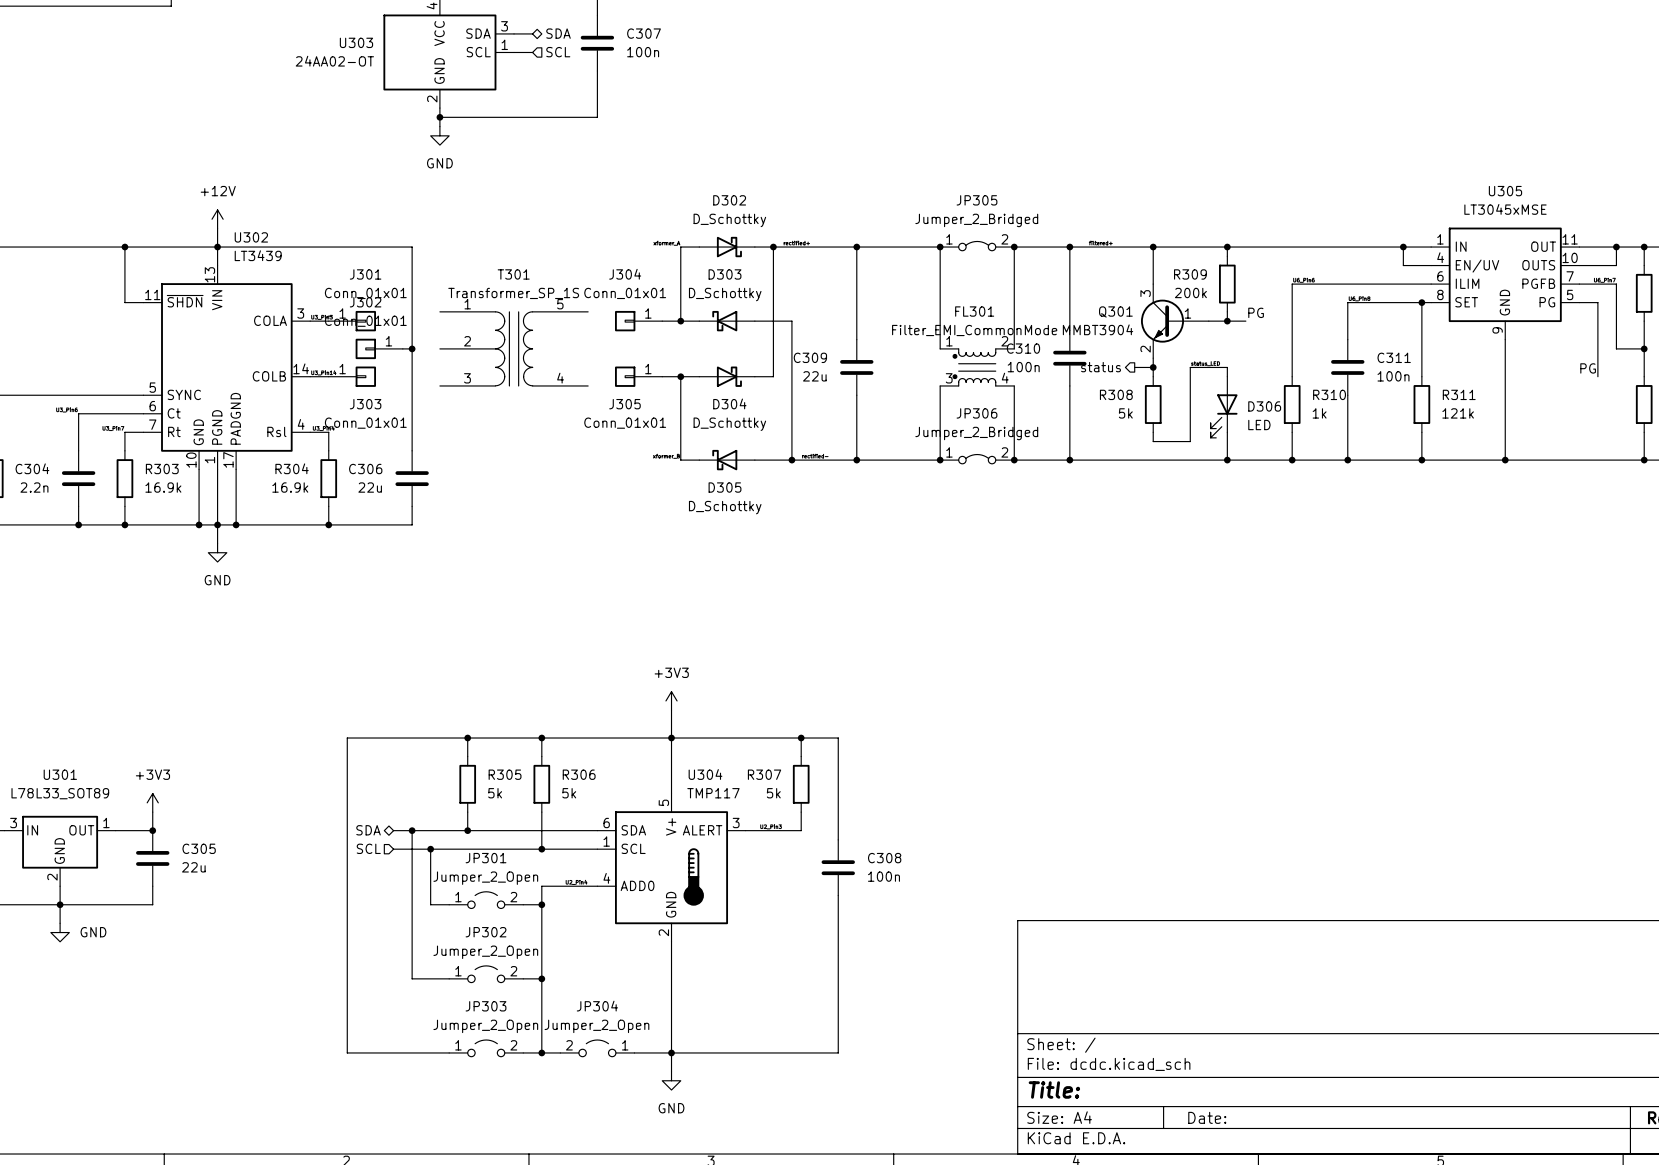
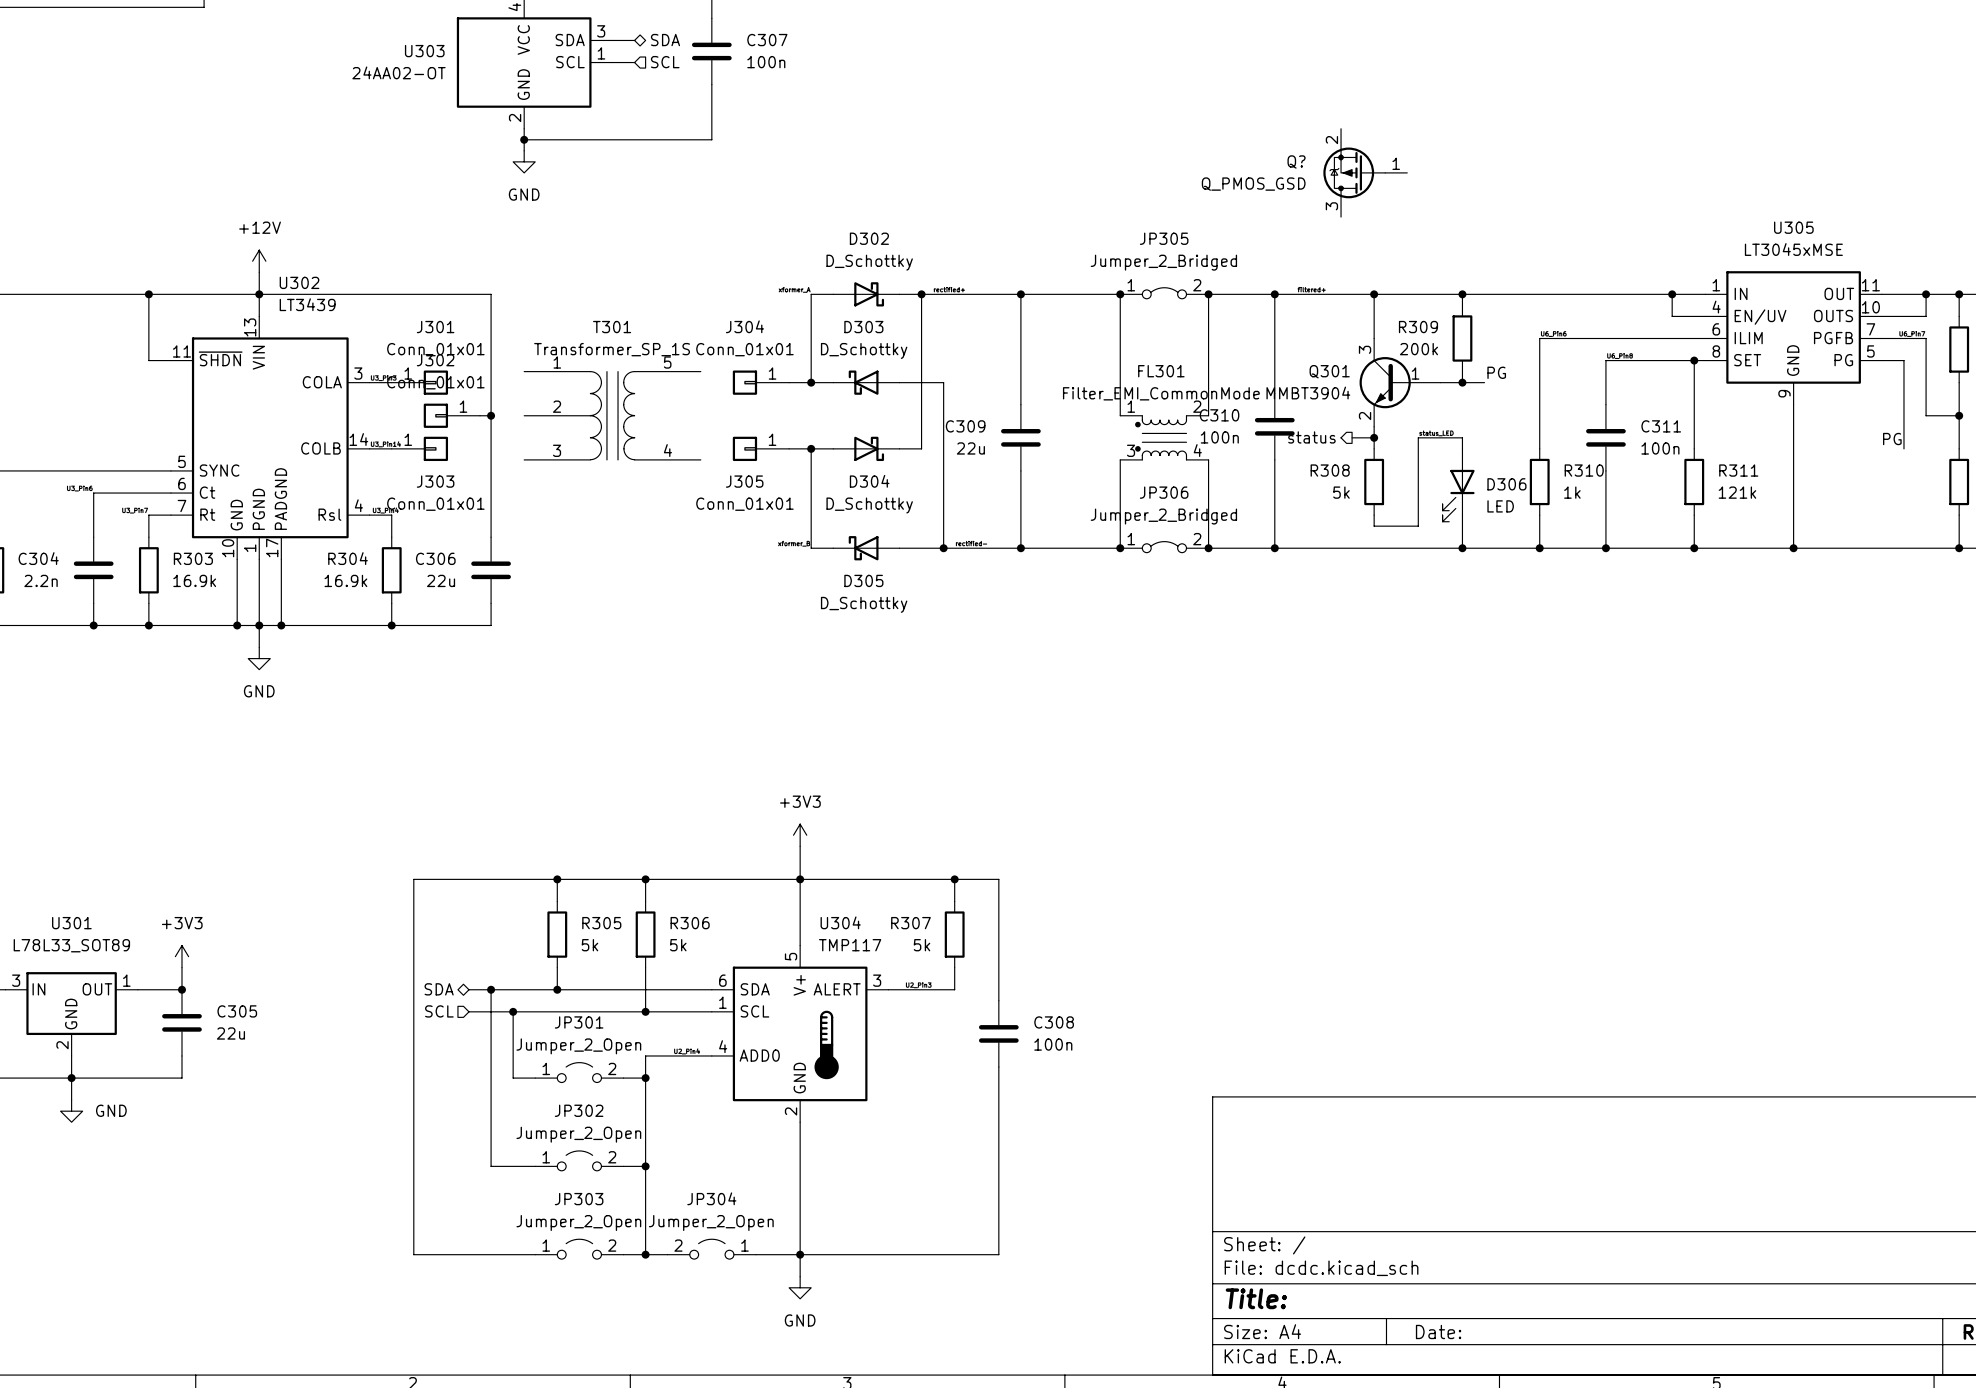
Q?: none -> Q_PMOS_GSD (1365, 172)

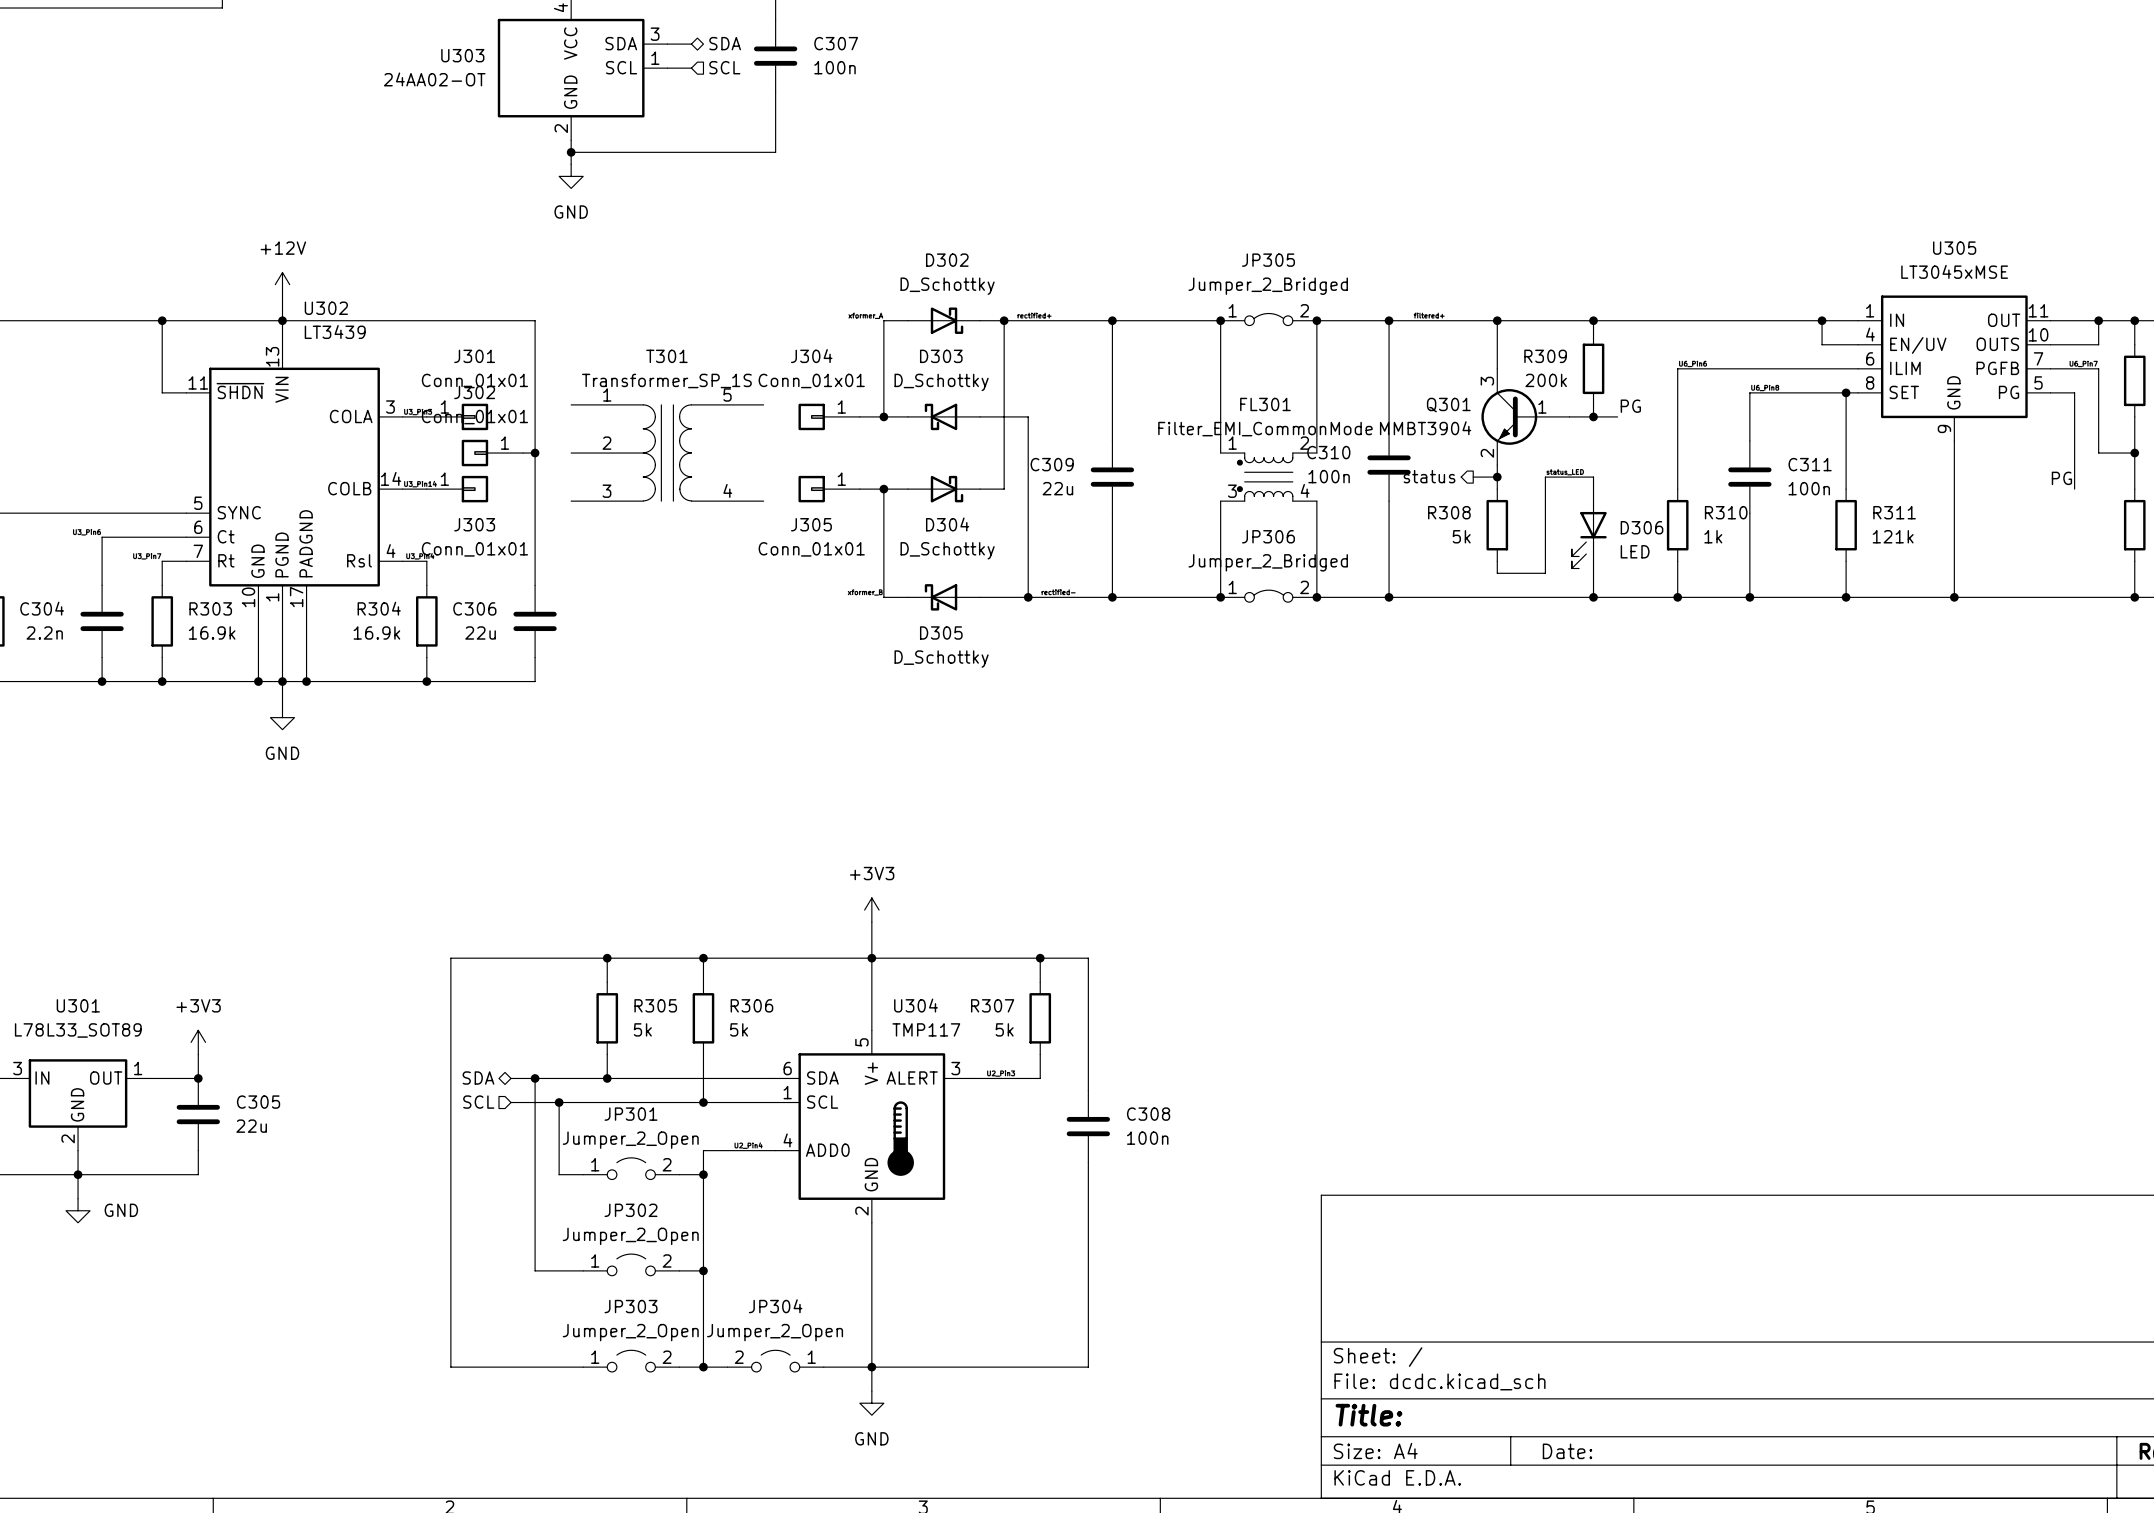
Q?: Q_PMOS_GSD (1365, 172) -> none

